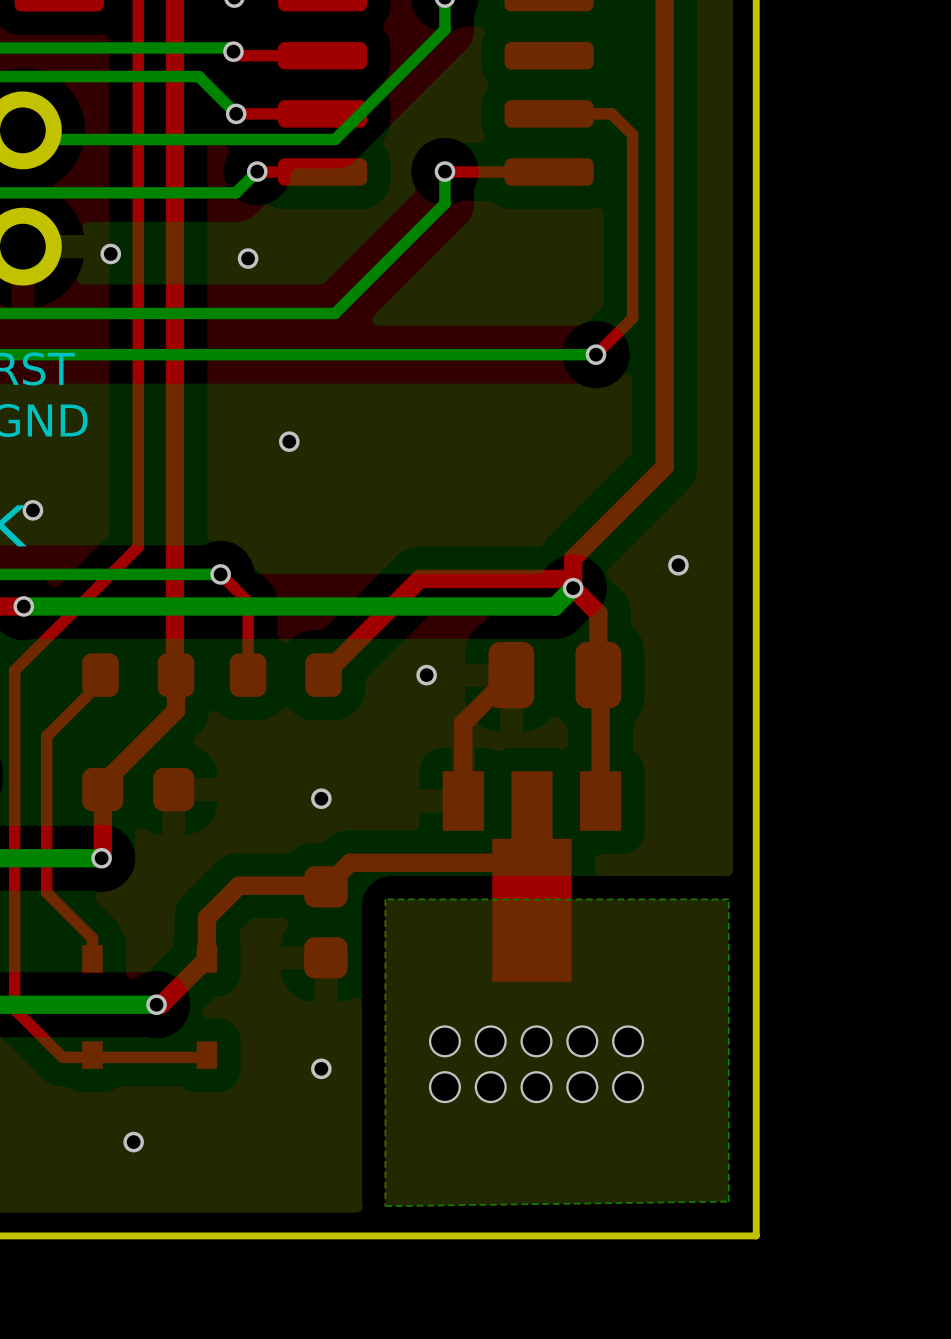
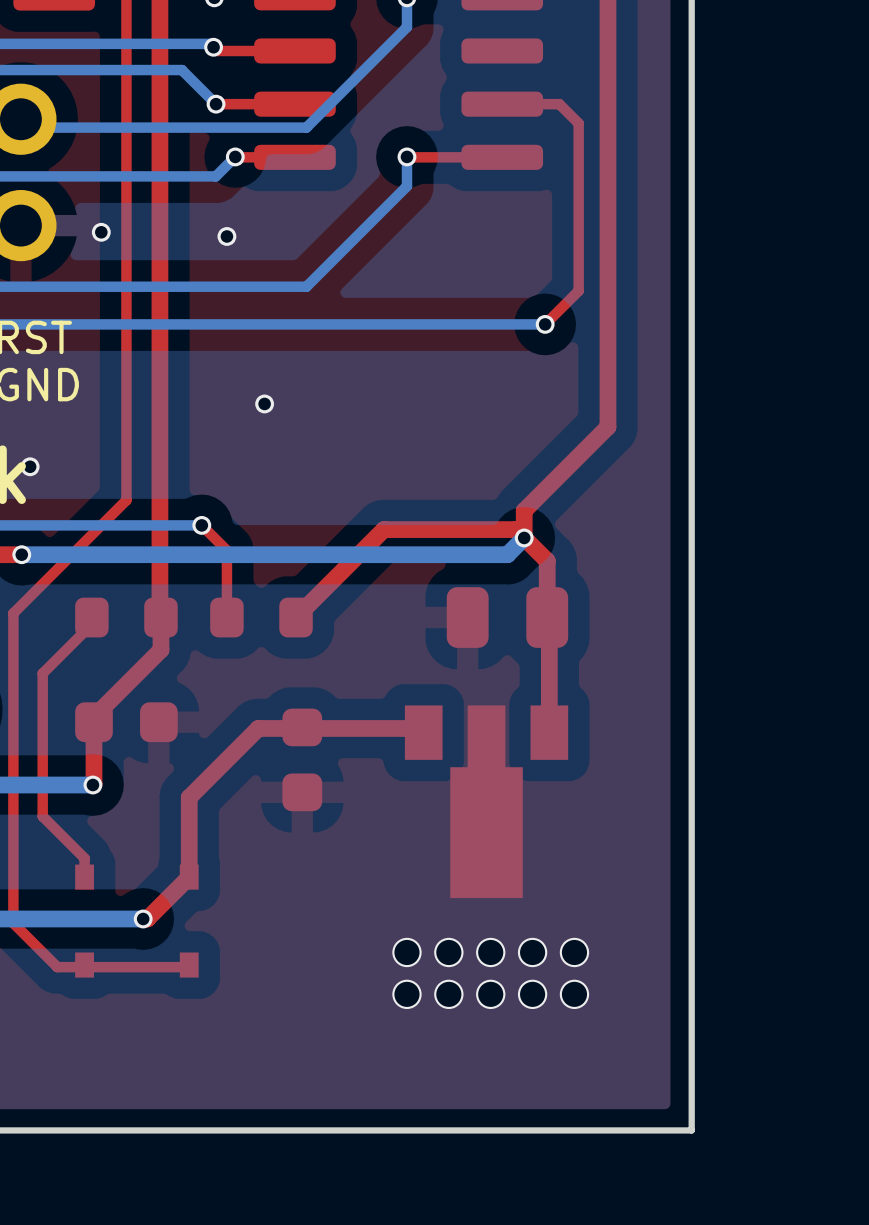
via: (678, 565) -> none
via: (426, 675) -> none
top track: (511, 675) (463, 723) (463, 801) -> none
via: (321, 798) -> none
top track: (531, 805) (531, 830) (499, 862) (349, 862) (325, 886) (238, 885) (206, 917) -> (423, 732) (419, 728) (258, 728) (189, 797) (189, 839)
bottom zone outline: (728, 899) (728, 1201) (385, 1206) (385, 899) (728, 899) -> none
part position: (325, 922) -> (302, 759)
via: (321, 1068) -> none
via: (133, 1142) -> none

